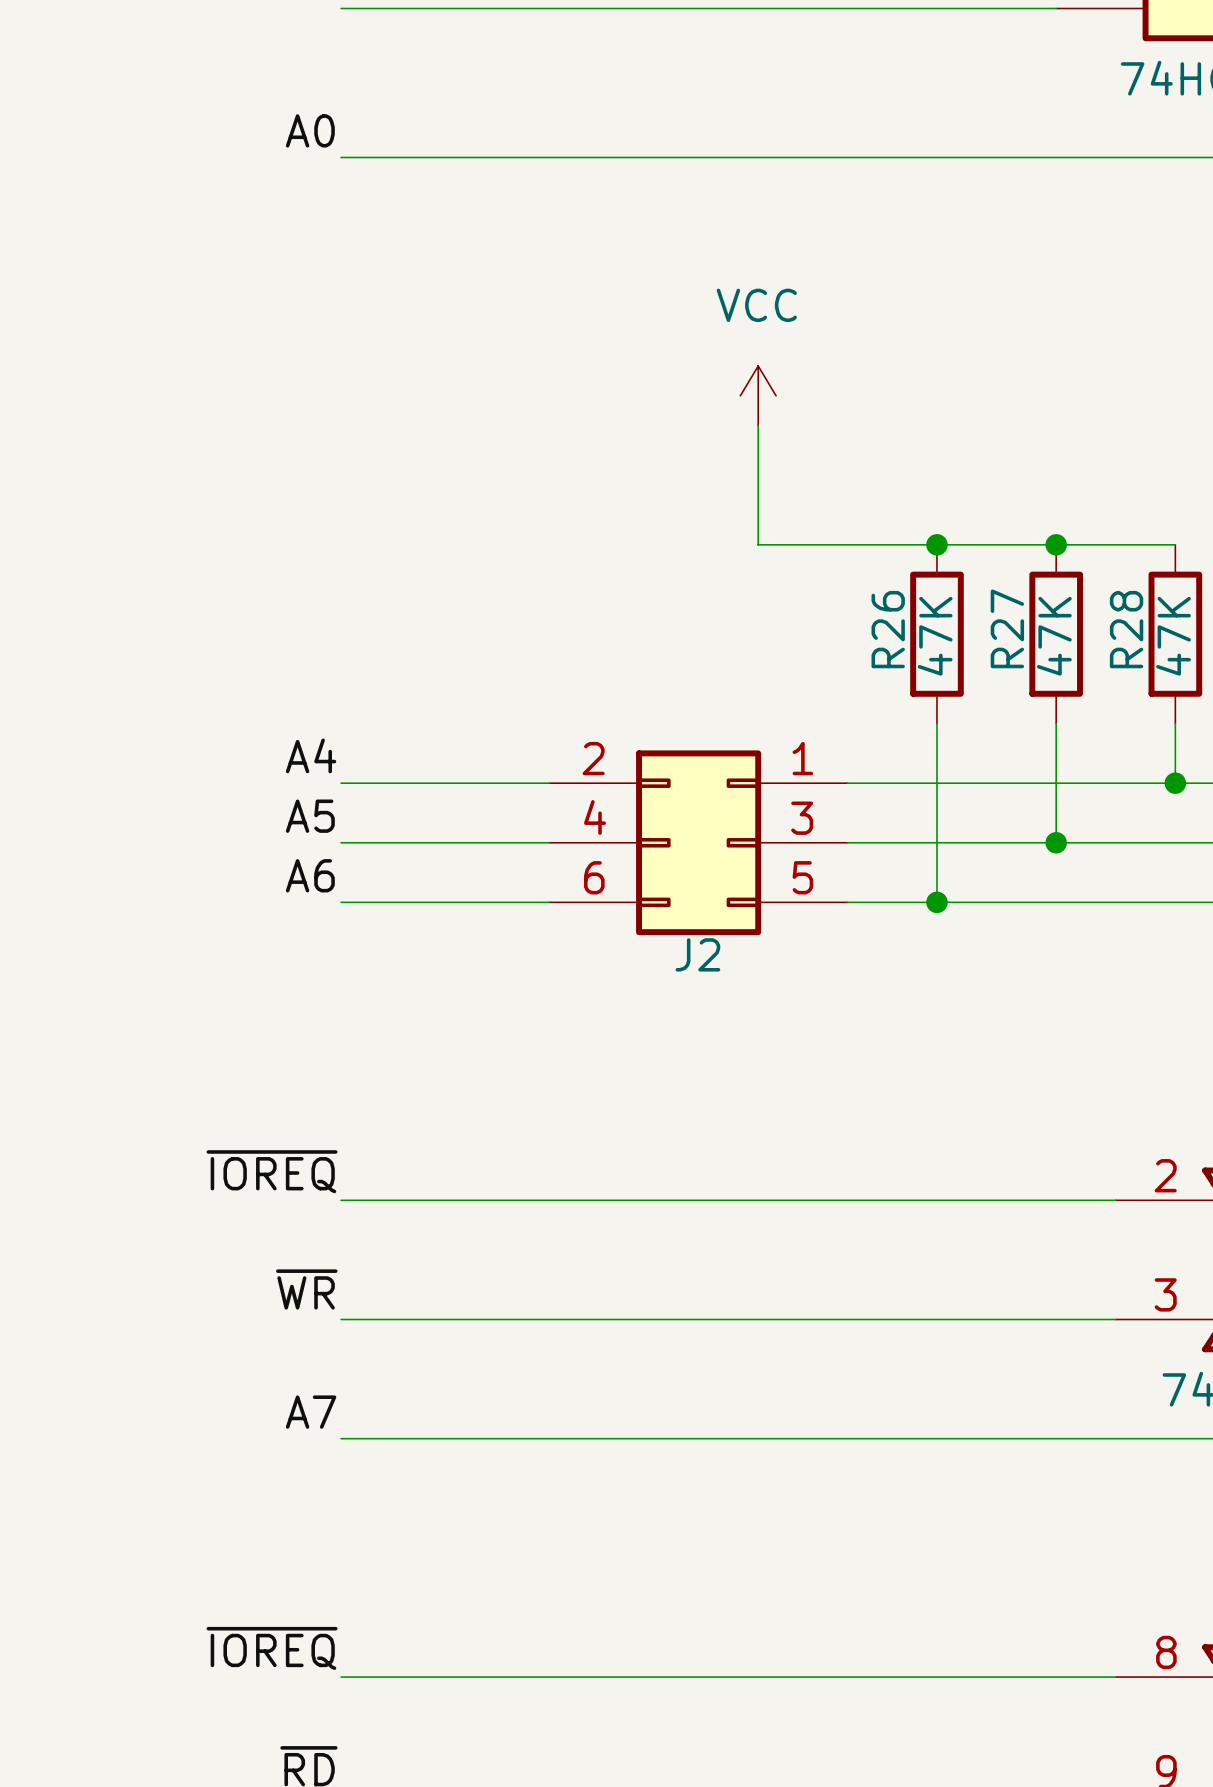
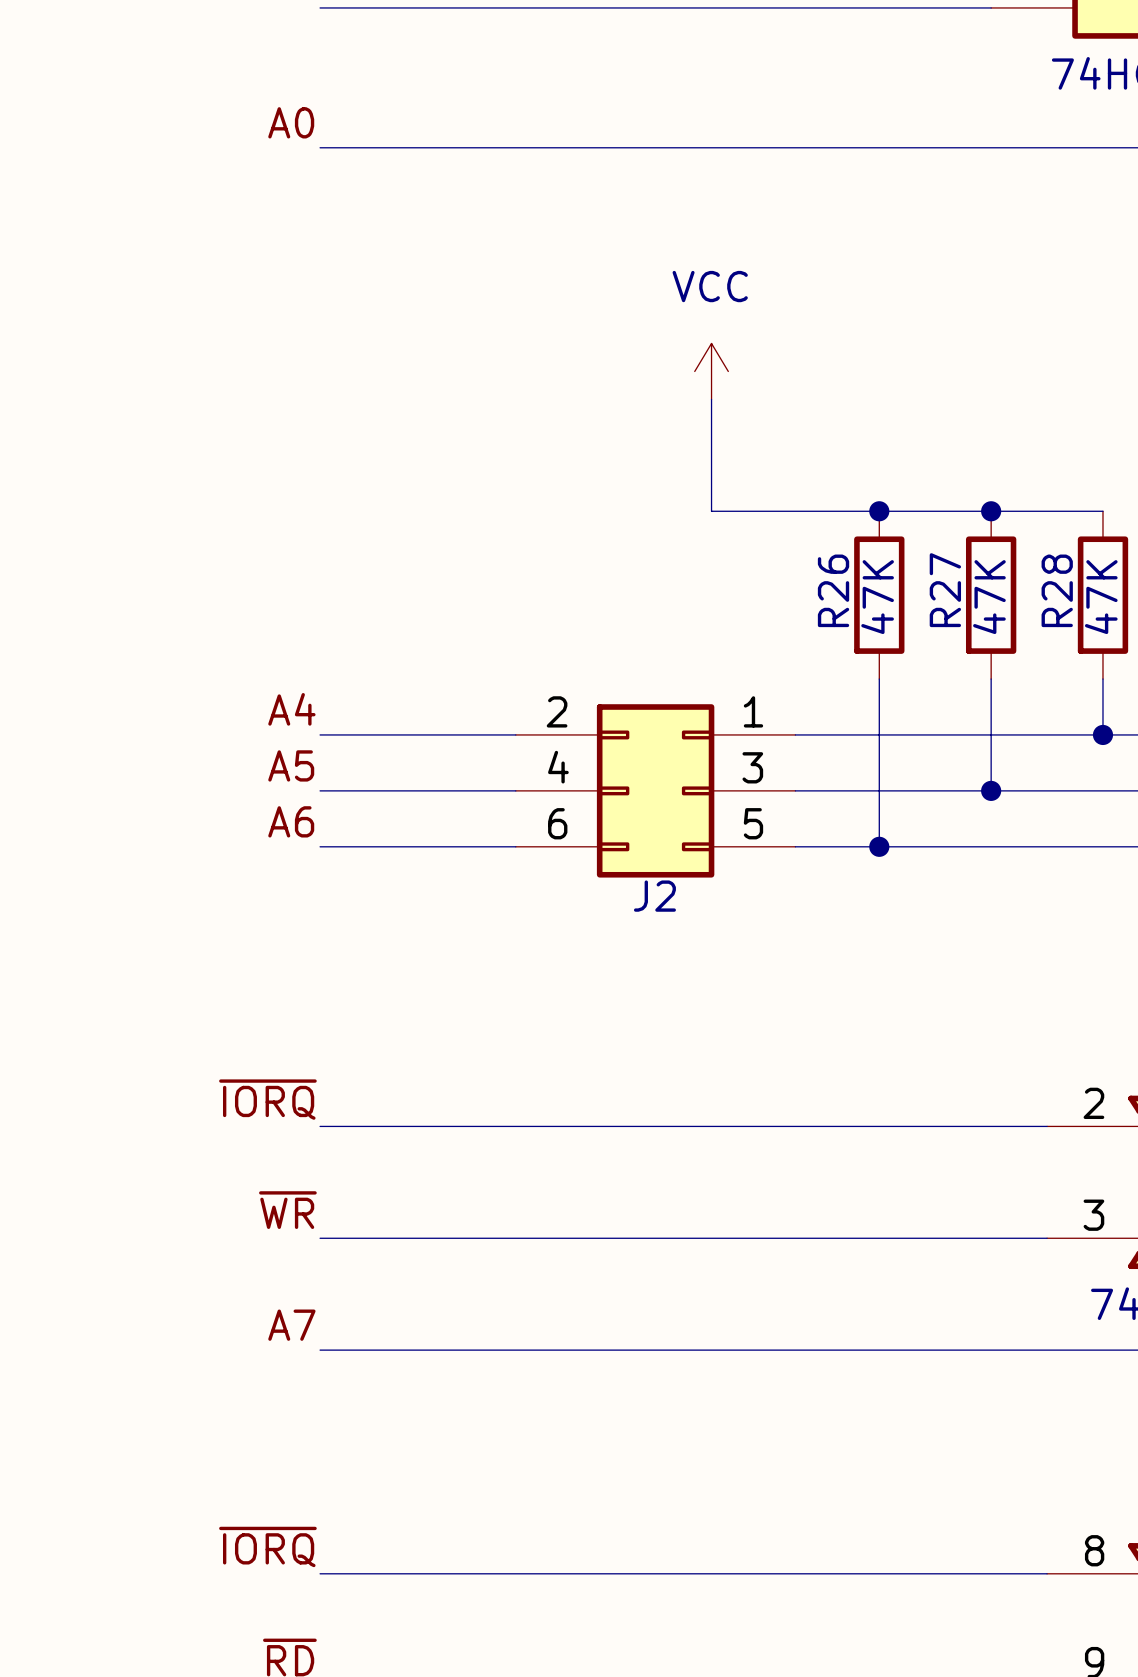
label: ~{IOREQ} (272, 1171) -> ~{IORQ} (267, 1099)
label: ~{IOREQ} (272, 1648) -> ~{IORQ} (267, 1546)

